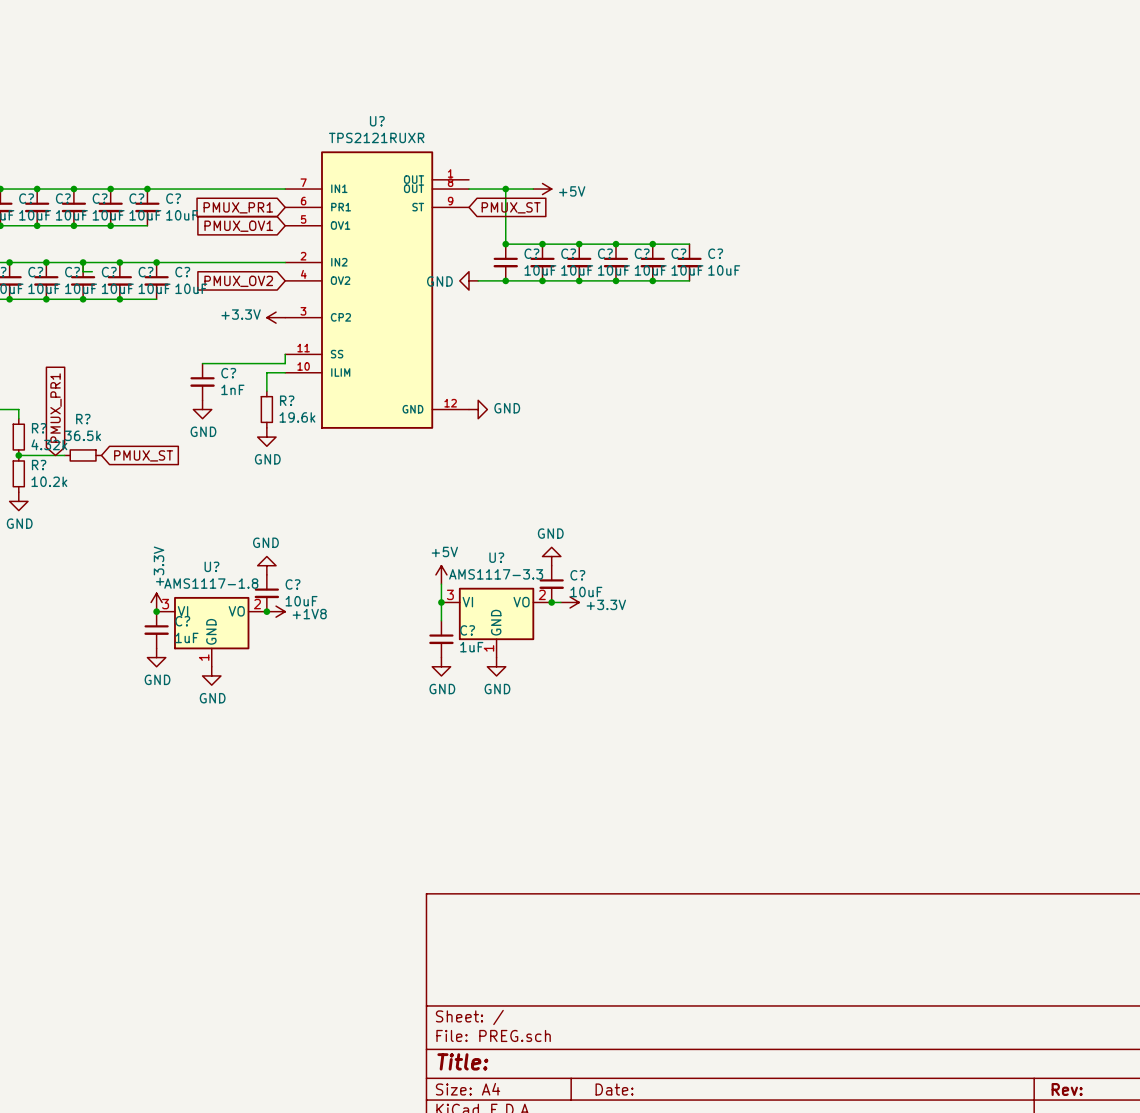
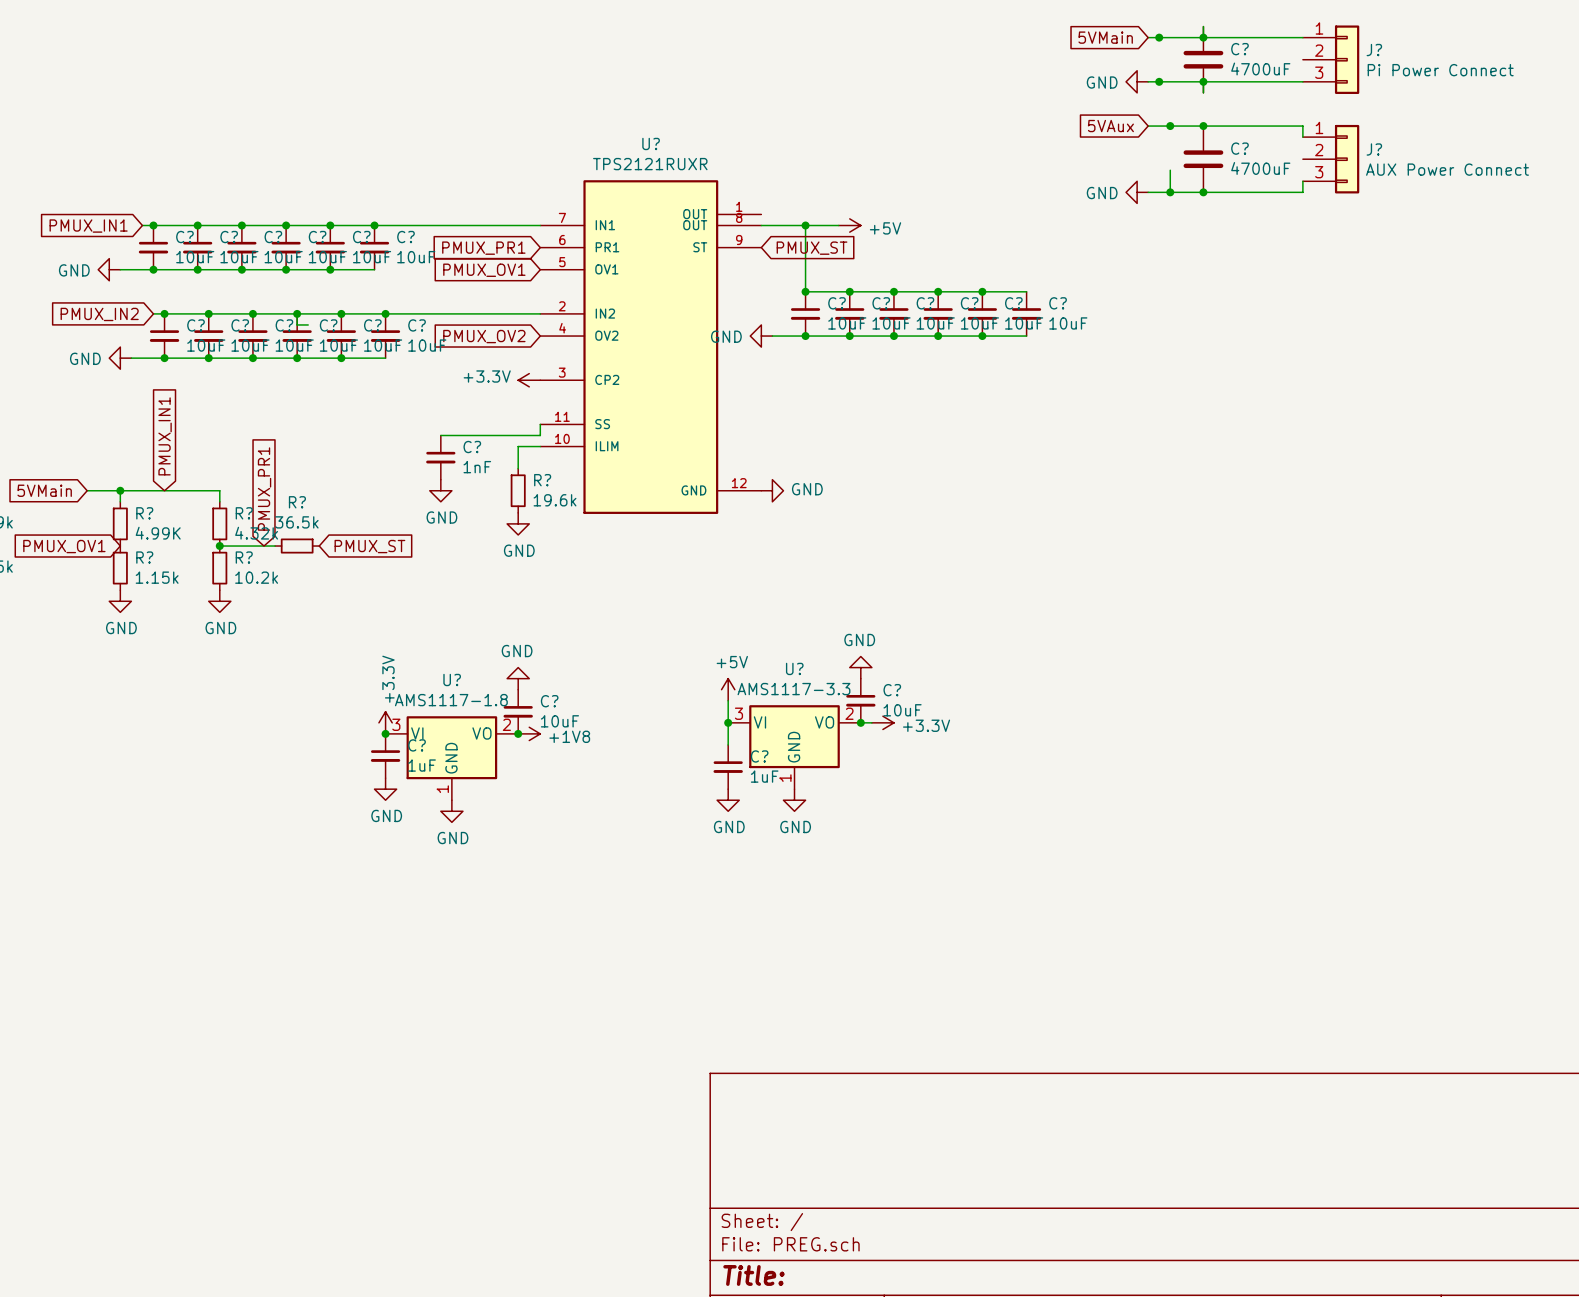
wire: none -> (1203, 26) (1203, 37)
global label: none -> 5VMain (1105, 37)
wire: none -> (1148, 37) (1302, 37)
junction: none -> (1159, 37)
junction: none -> (1203, 37)
C?: none -> 4700uF (1203, 59)
J?: none -> Pi Power Connect (1331, 59)
power symbol: none -> GND (1137, 81)
wire: none -> (1148, 81) (1302, 81)
junction: none -> (1159, 81)
wire: none -> (1203, 81) (1203, 92)
junction: none -> (1203, 81)
global label: none -> 5VAux (1110, 126)
wire: none -> (1148, 126) (1302, 126) (1302, 137)
junction: none -> (1170, 126)
junction: none -> (1203, 126)
C?: none -> 4700uF (1203, 159)
J?: none -> AUX Power Connect (1331, 159)
wire: none -> (1170, 170) (1170, 192)
wire: none -> (1302, 181) (1302, 192) (1148, 192)
power symbol: none -> GND (1137, 192)
junction: none -> (1170, 192)
junction: none -> (1203, 192)

